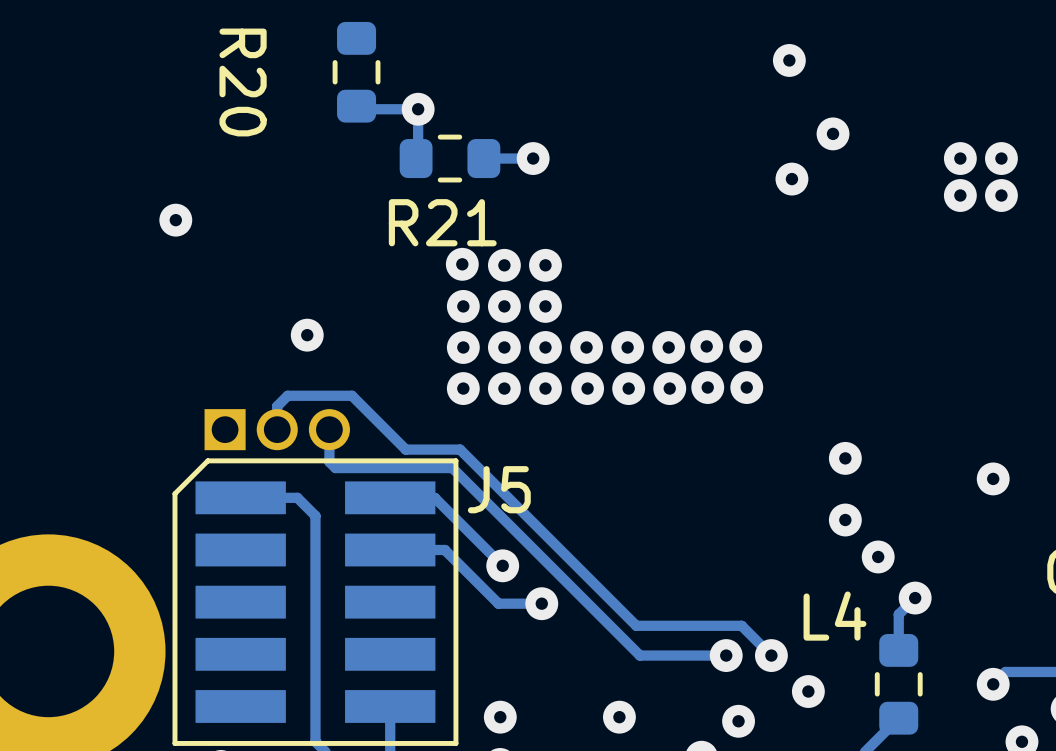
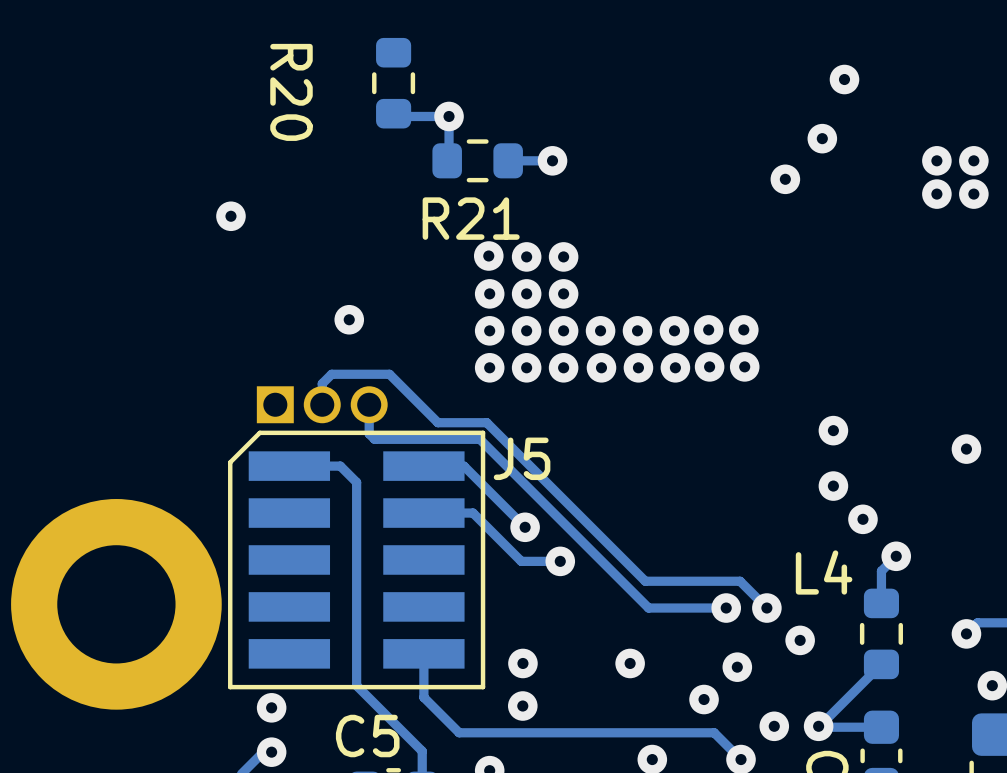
via: (789, 60) -> none
via: none -> (844, 79)

